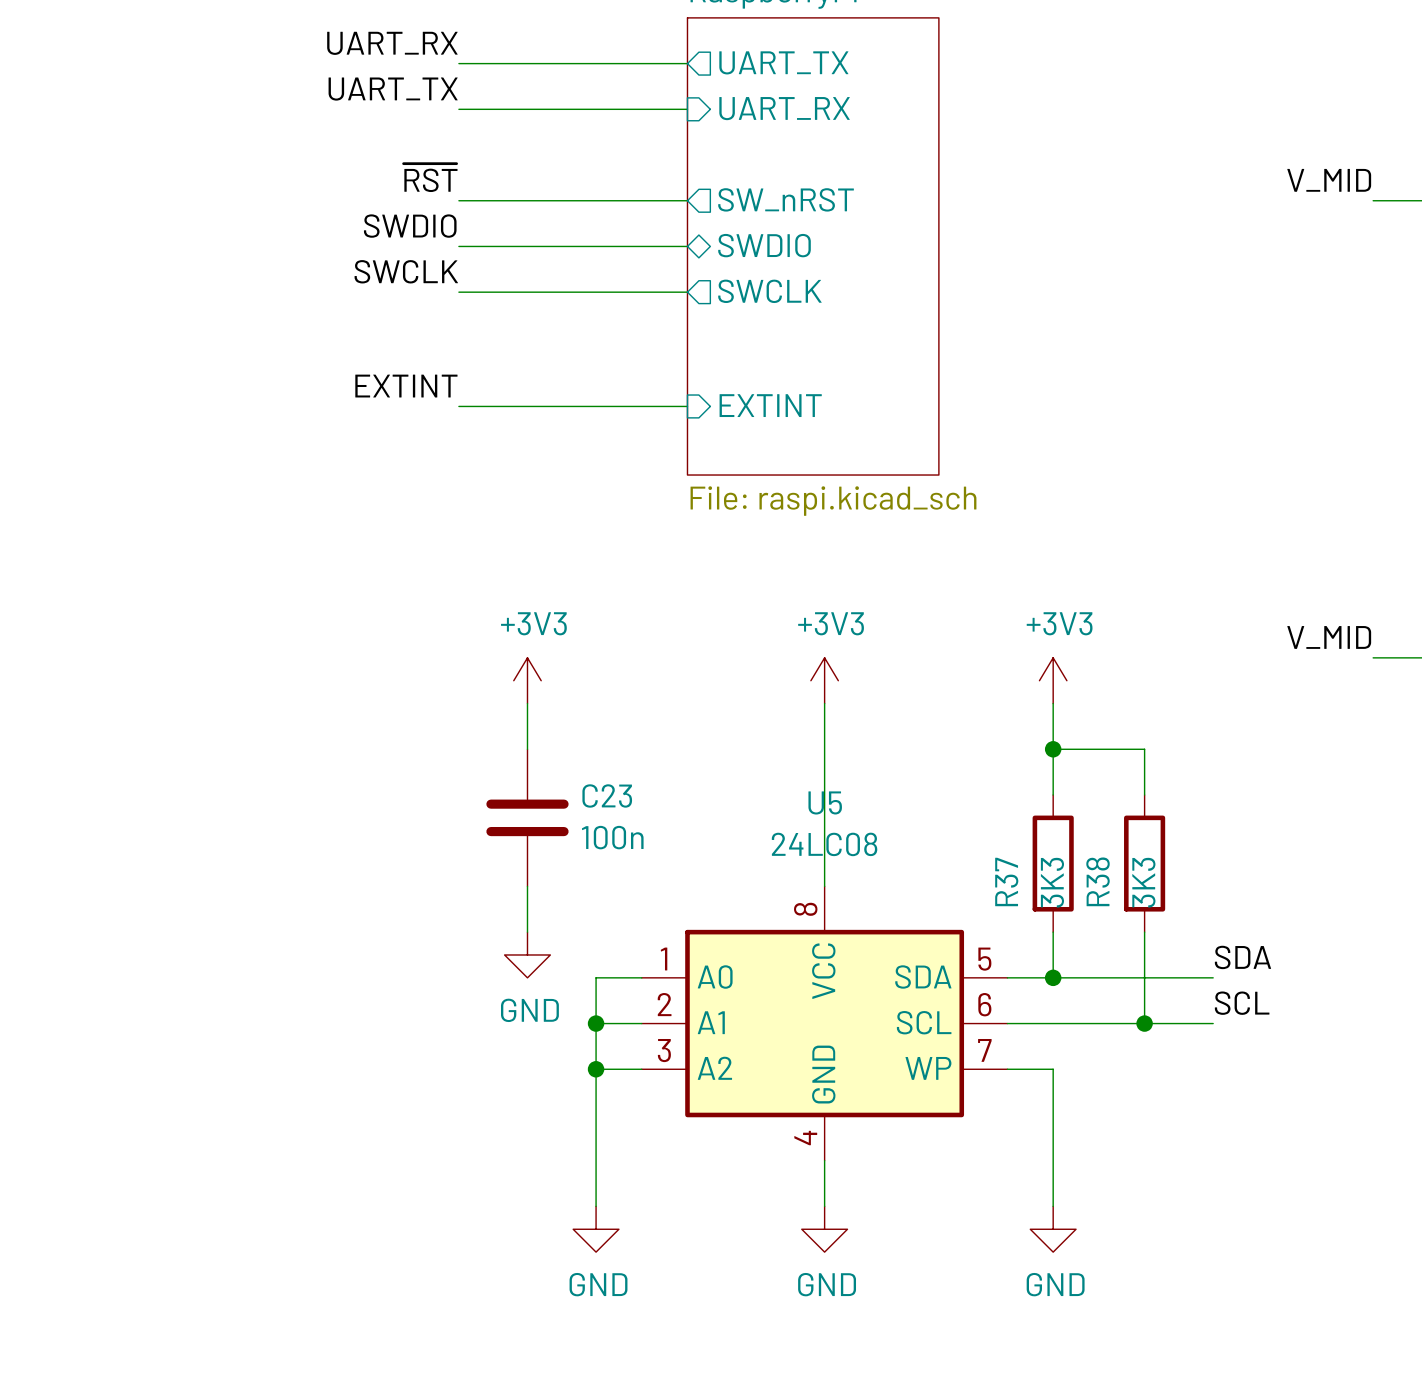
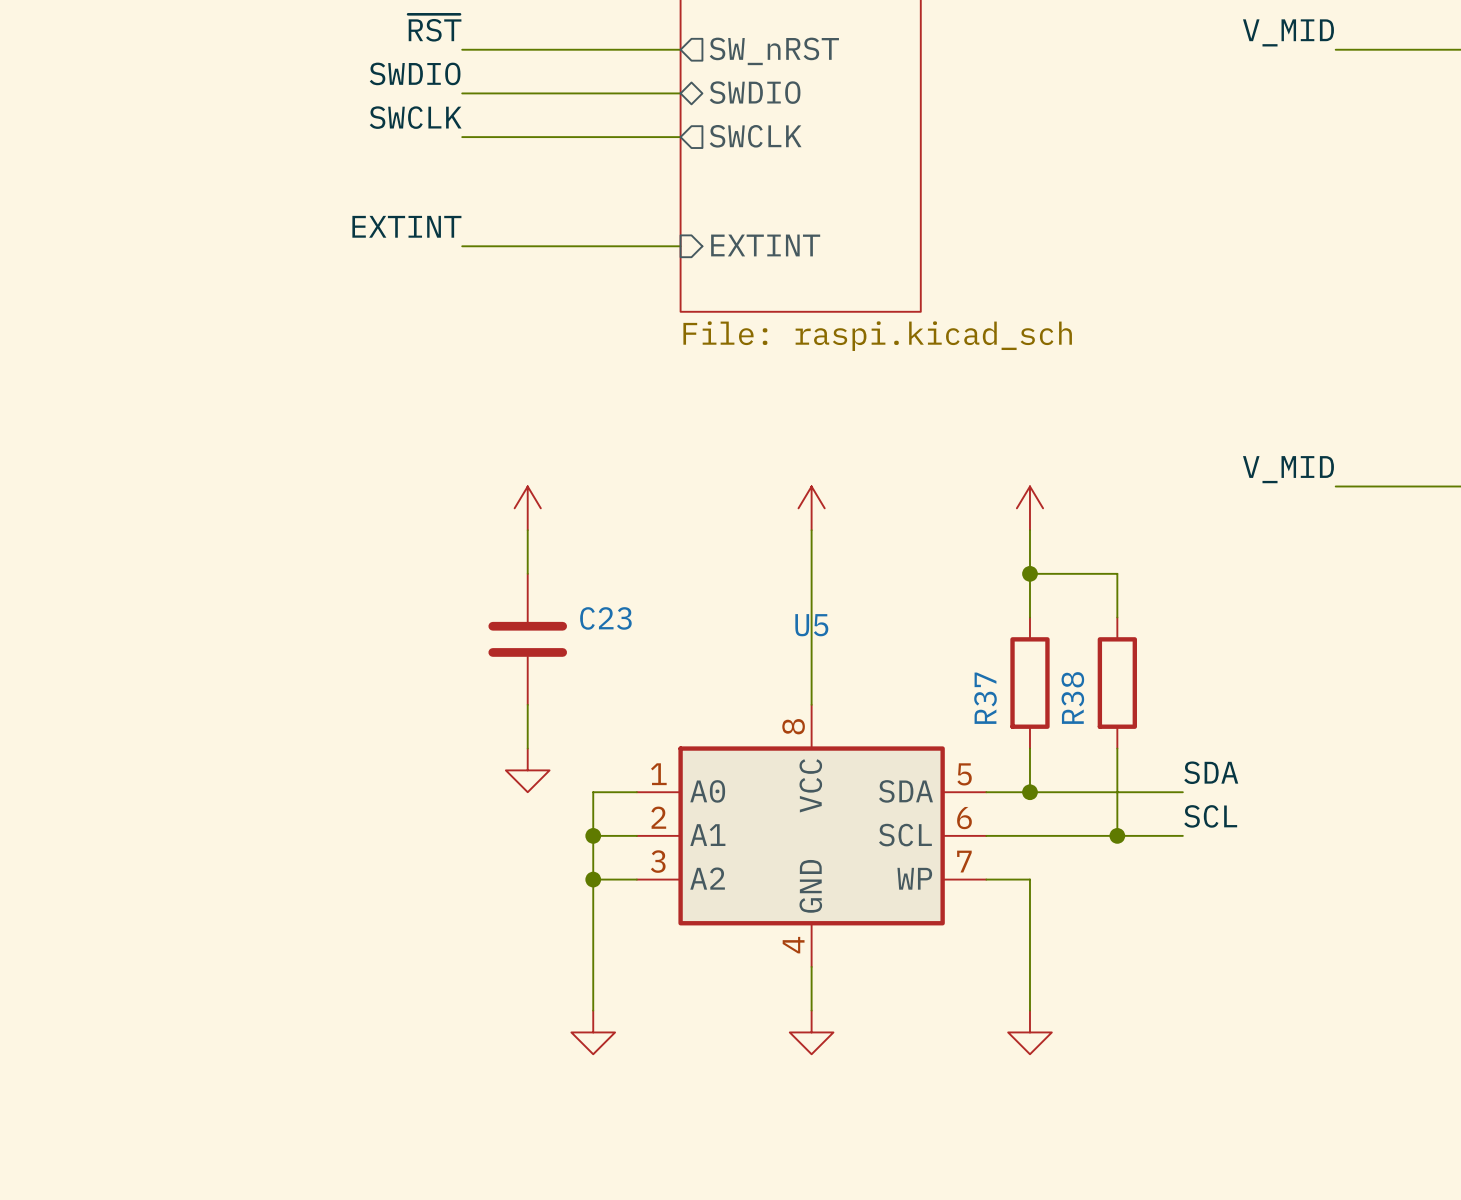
power symbol text: +3V3 (533, 623) -> none
power symbol text: +3V3 (831, 623) -> none
power symbol text: +3V3 (1059, 623) -> none
C23 value: 100n (612, 837) -> none
U5 value: 24LC08 (824, 844) -> none
R37 value: 3K3 (1052, 882) -> none
R38 value: 3K3 (1143, 882) -> none
power symbol text: GND (529, 1010) -> none
power symbol text: GND (598, 1284) -> none
power symbol text: GND (827, 1284) -> none
power symbol text: GND (1055, 1284) -> none

